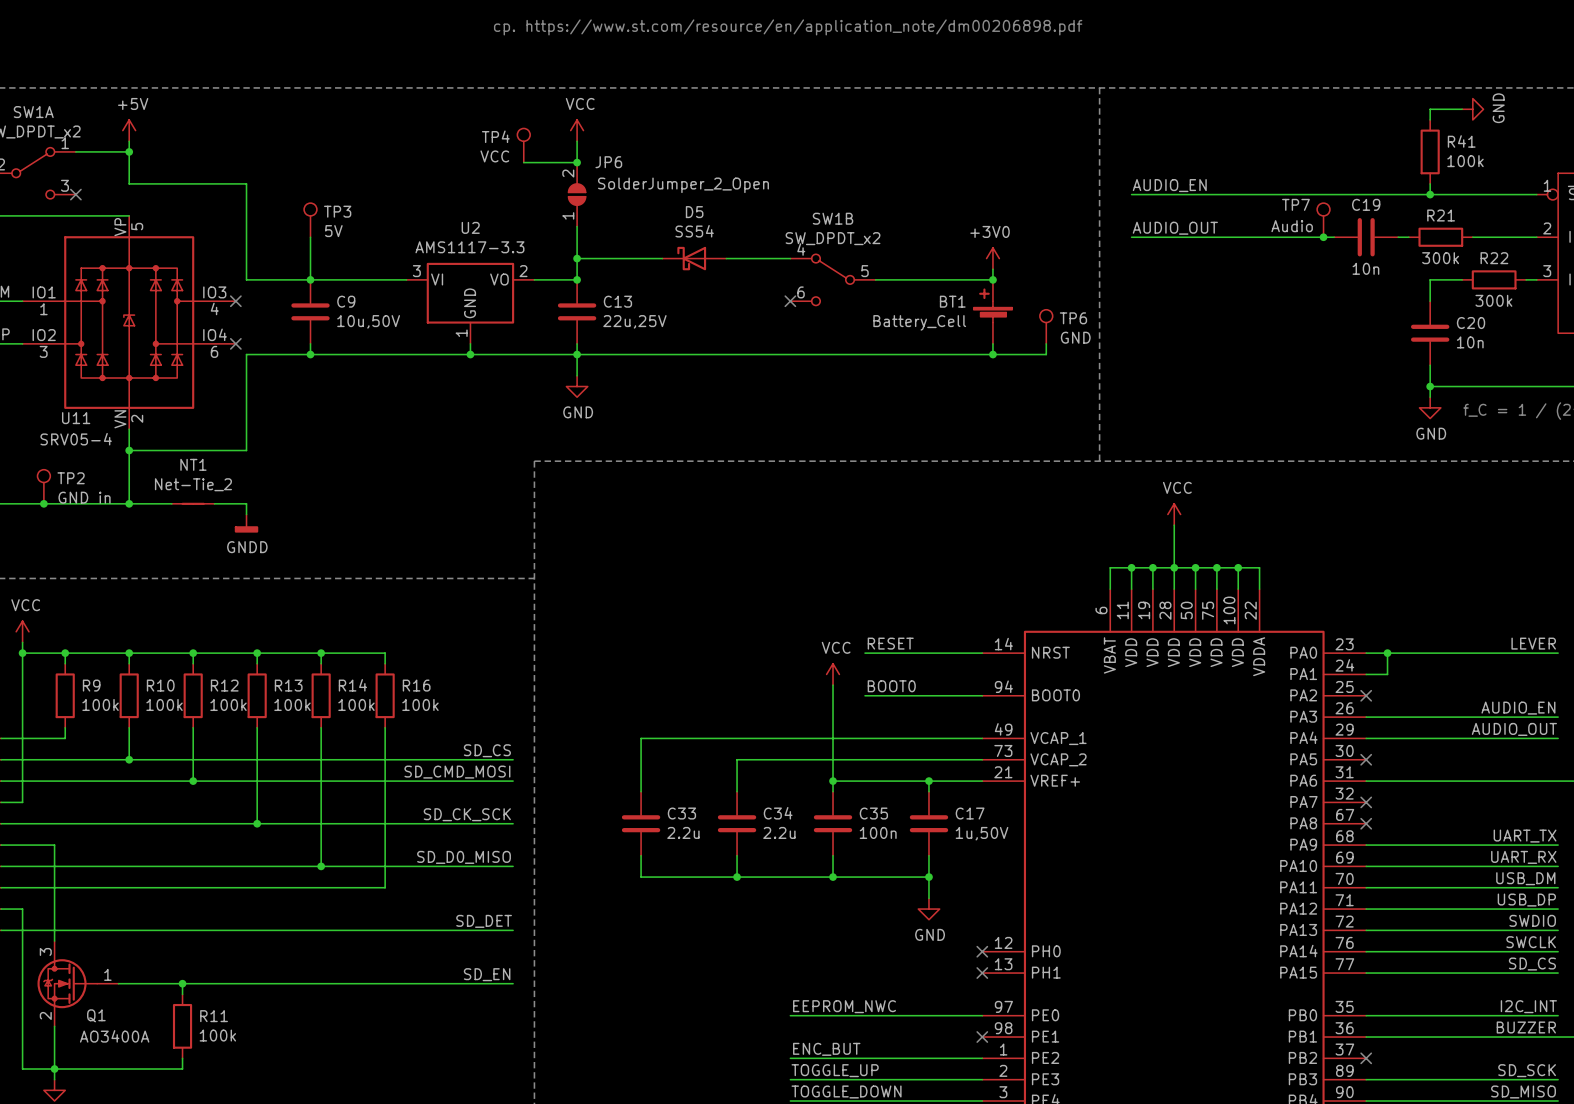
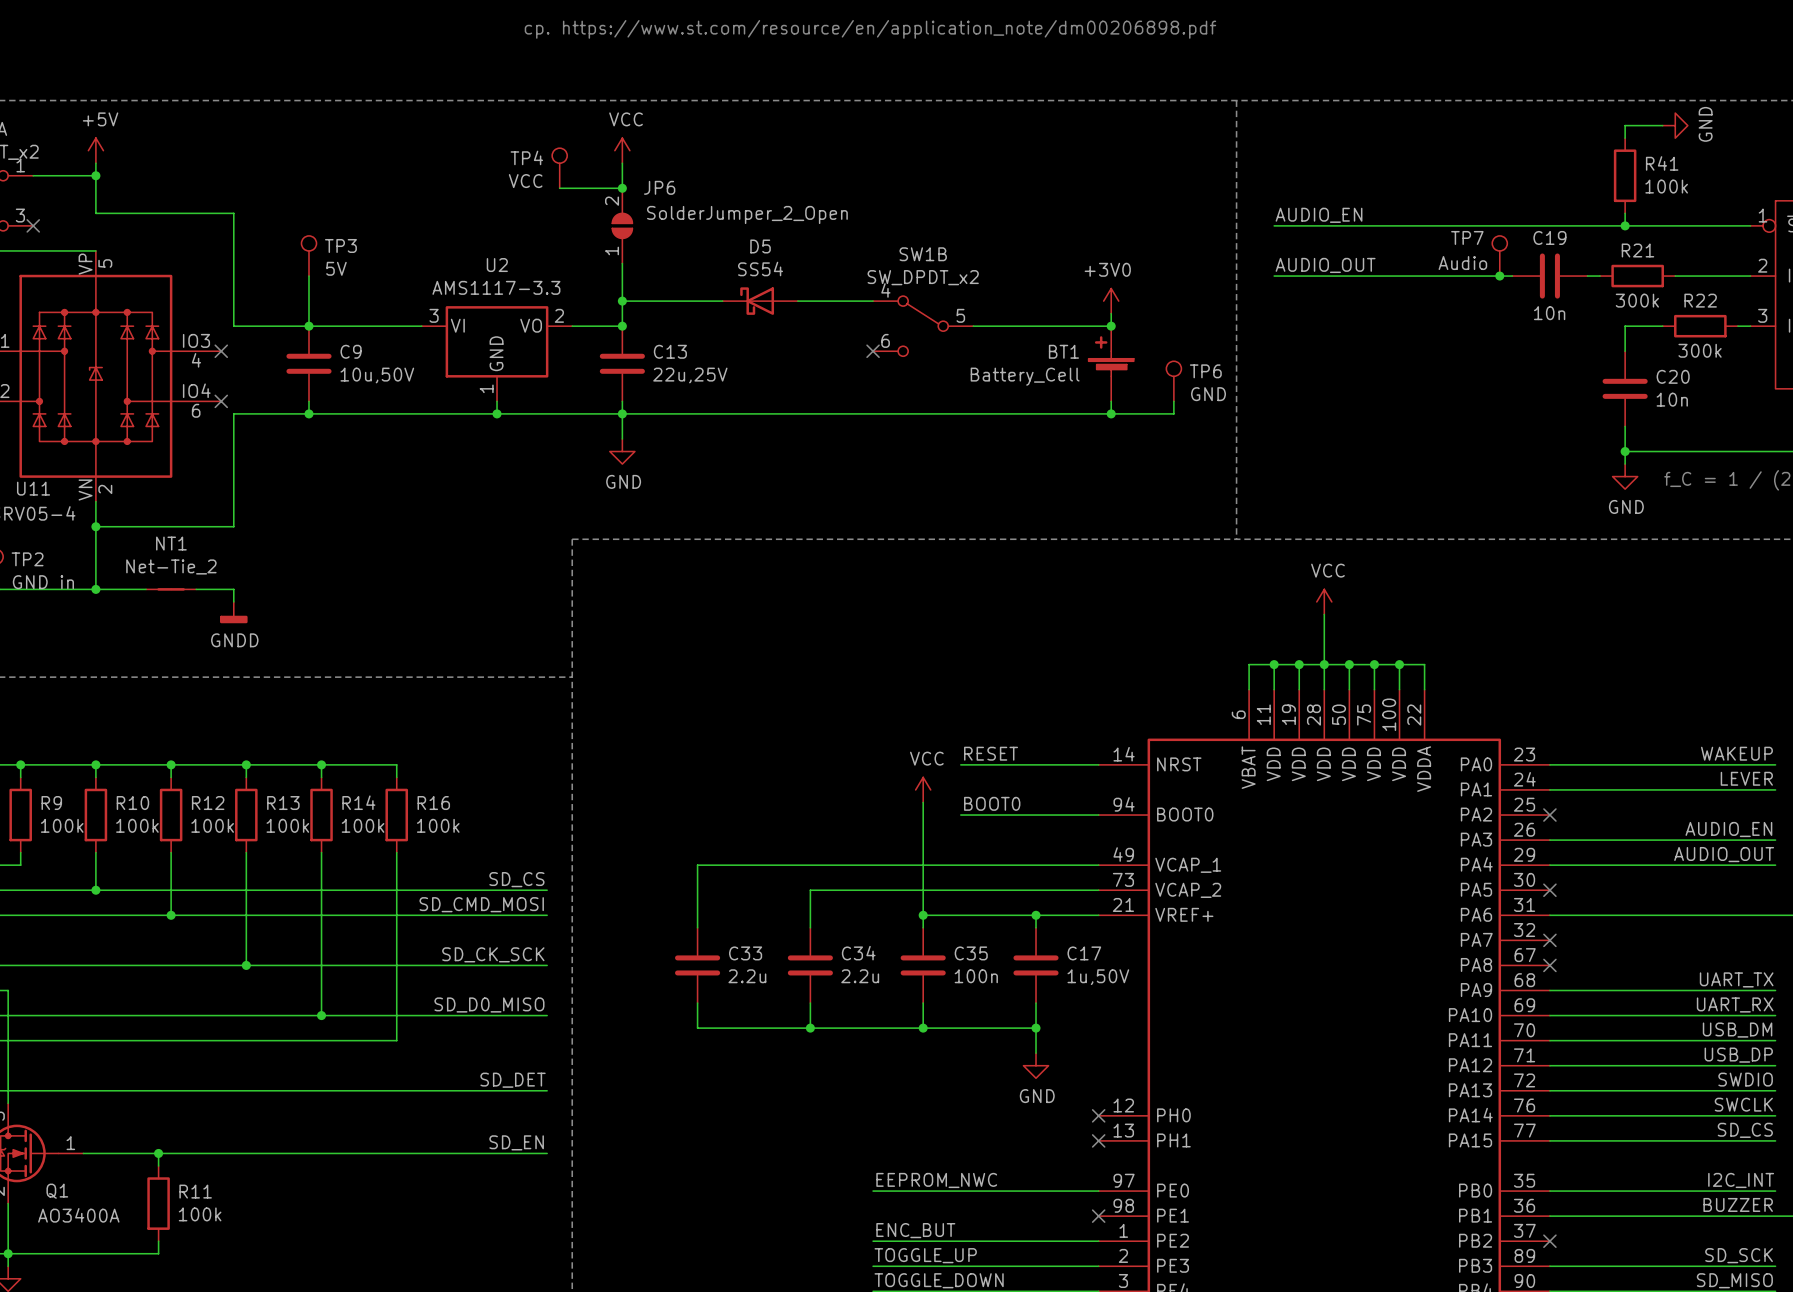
label: LEVER (1533, 643) -> WAKEUP (1736, 753)
wire: (1387, 653) (1387, 674) -> (1775, 789) (1574, 789)
junction: (1387, 653) -> none
label: none -> LEVER (1746, 778)

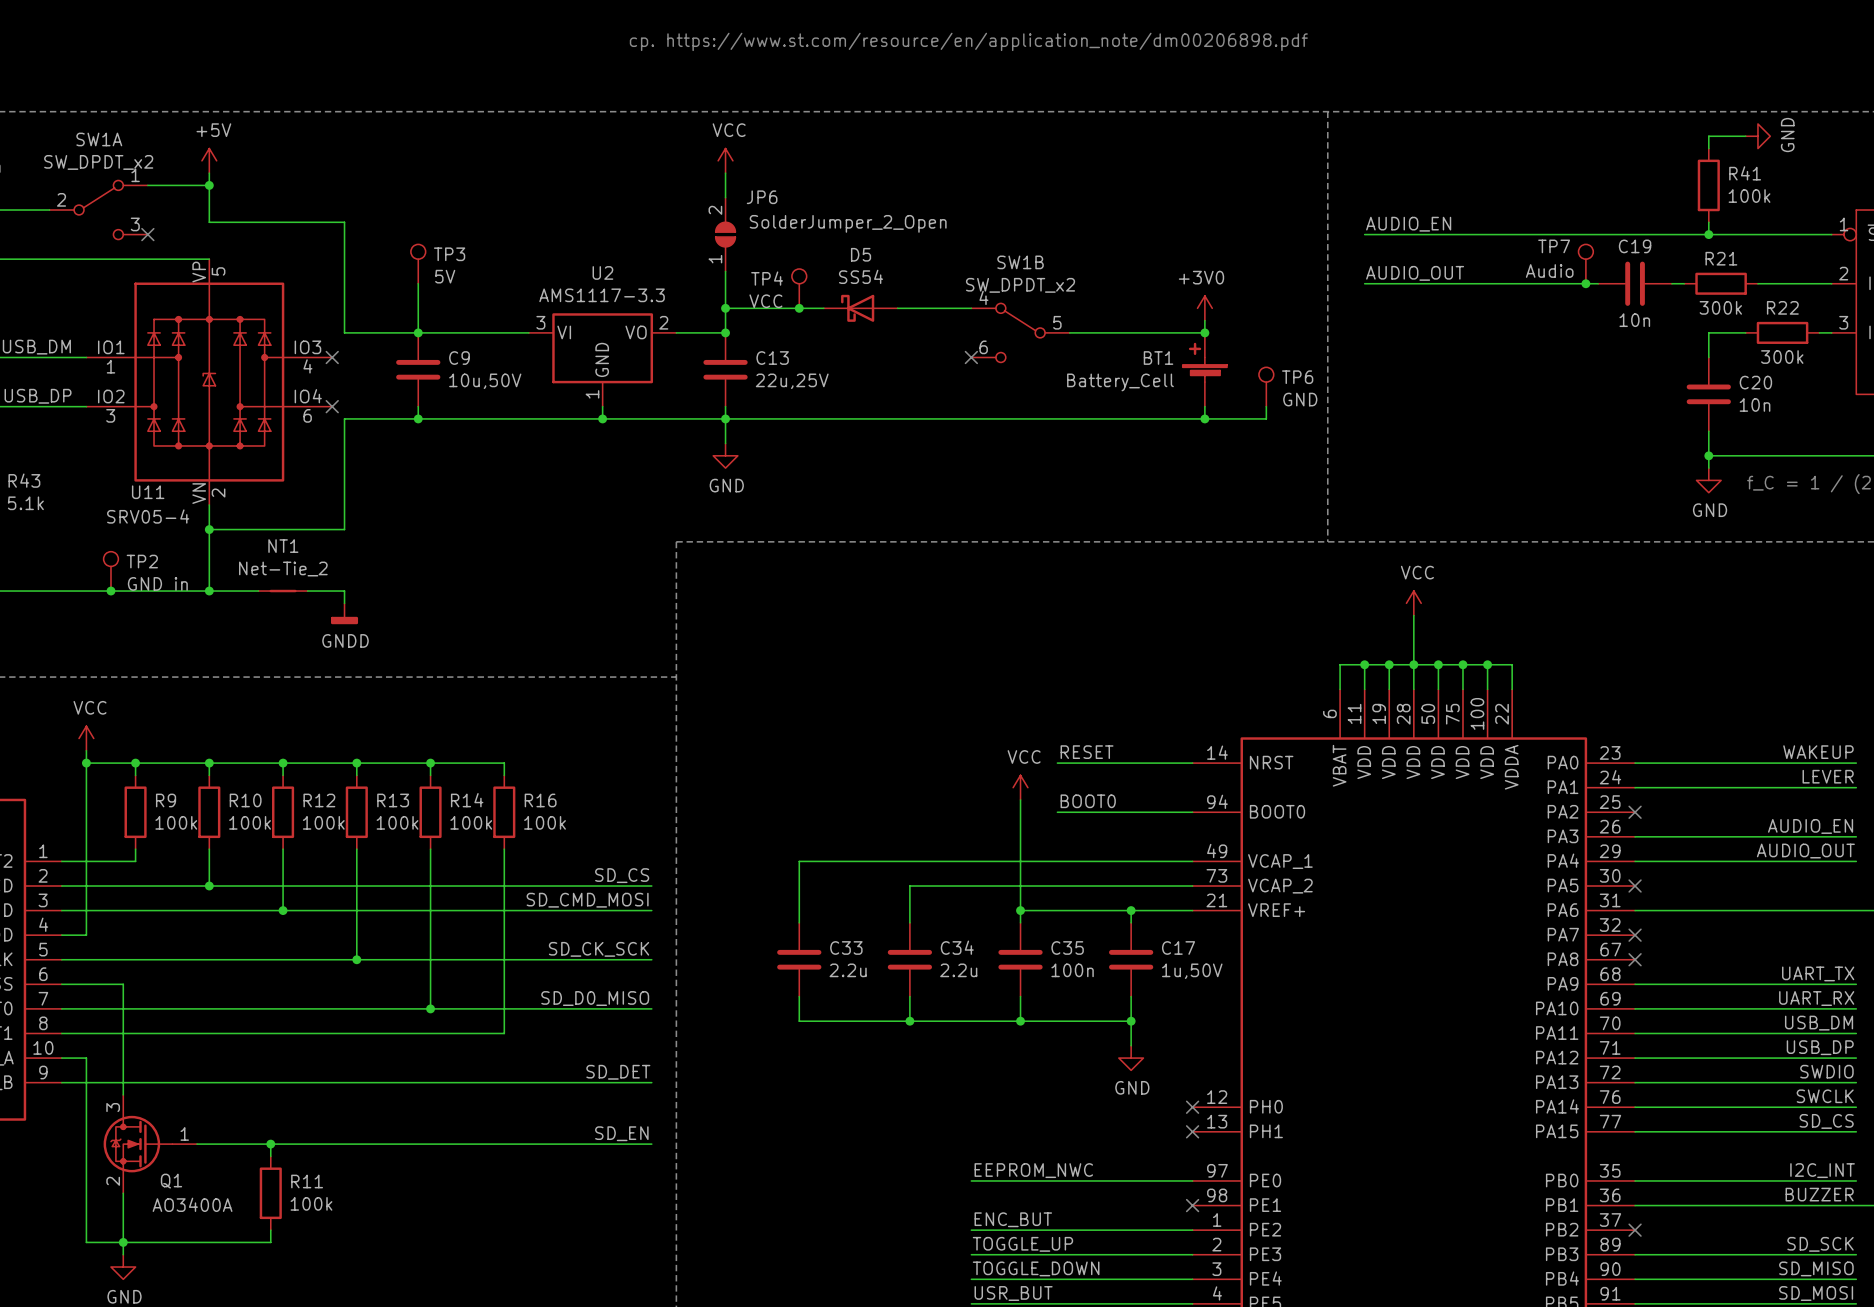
TP4 position: (559, 168) -> (799, 288)
wire: (559, 188) (622, 188) -> none
junction: (622, 188) -> none
junction: none -> (799, 308)

